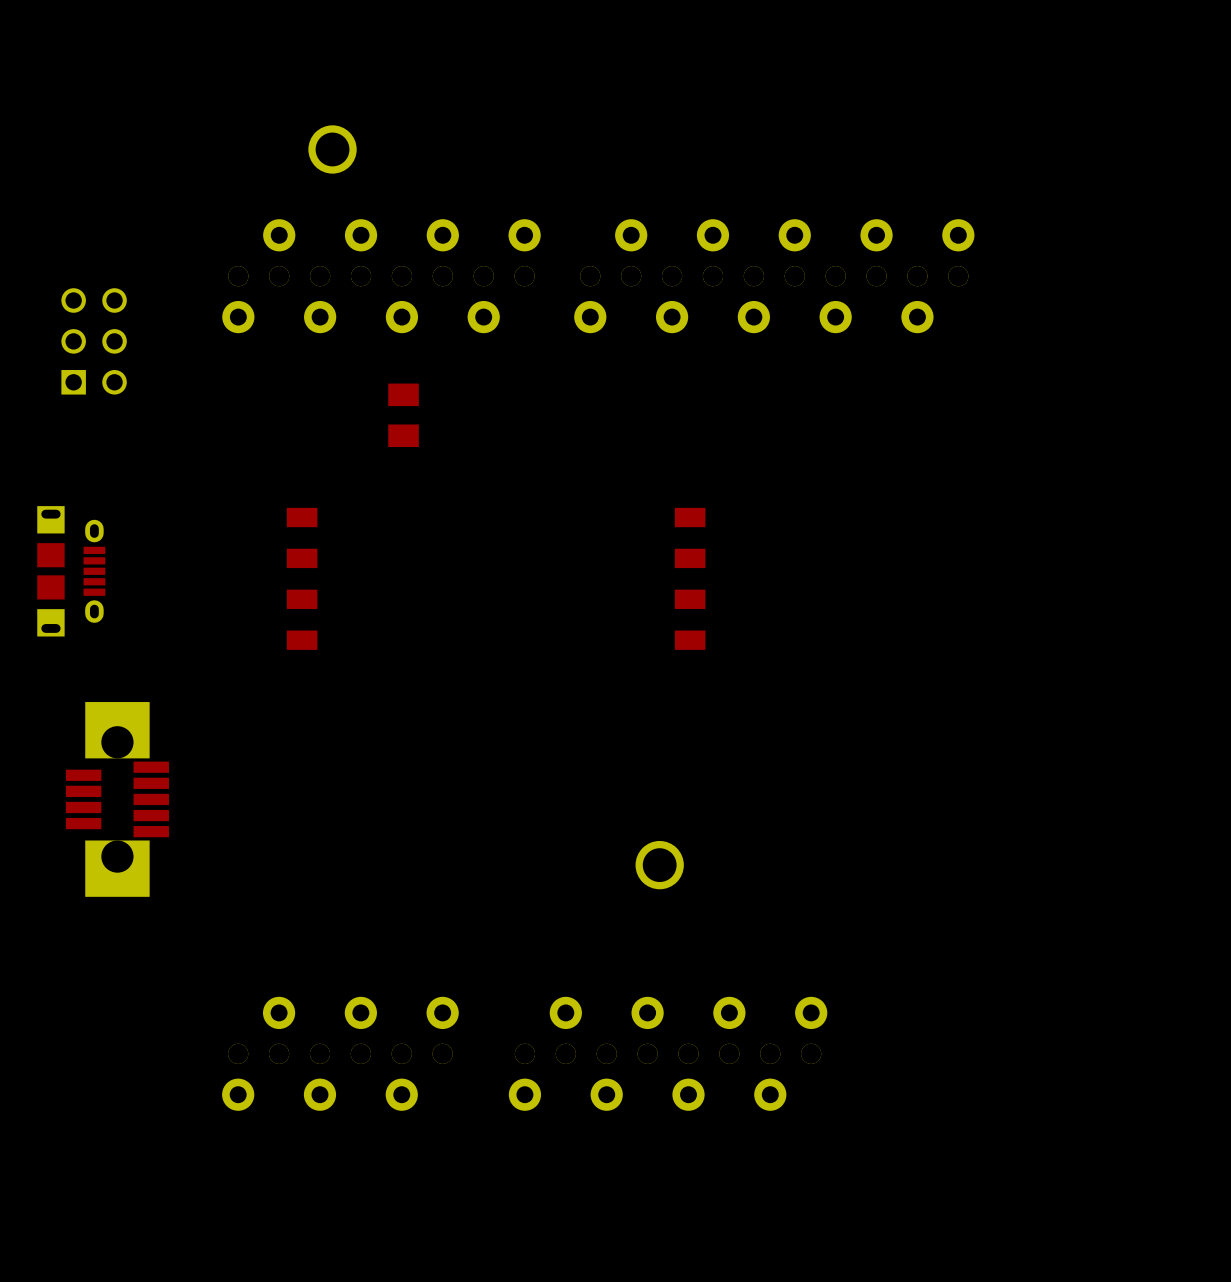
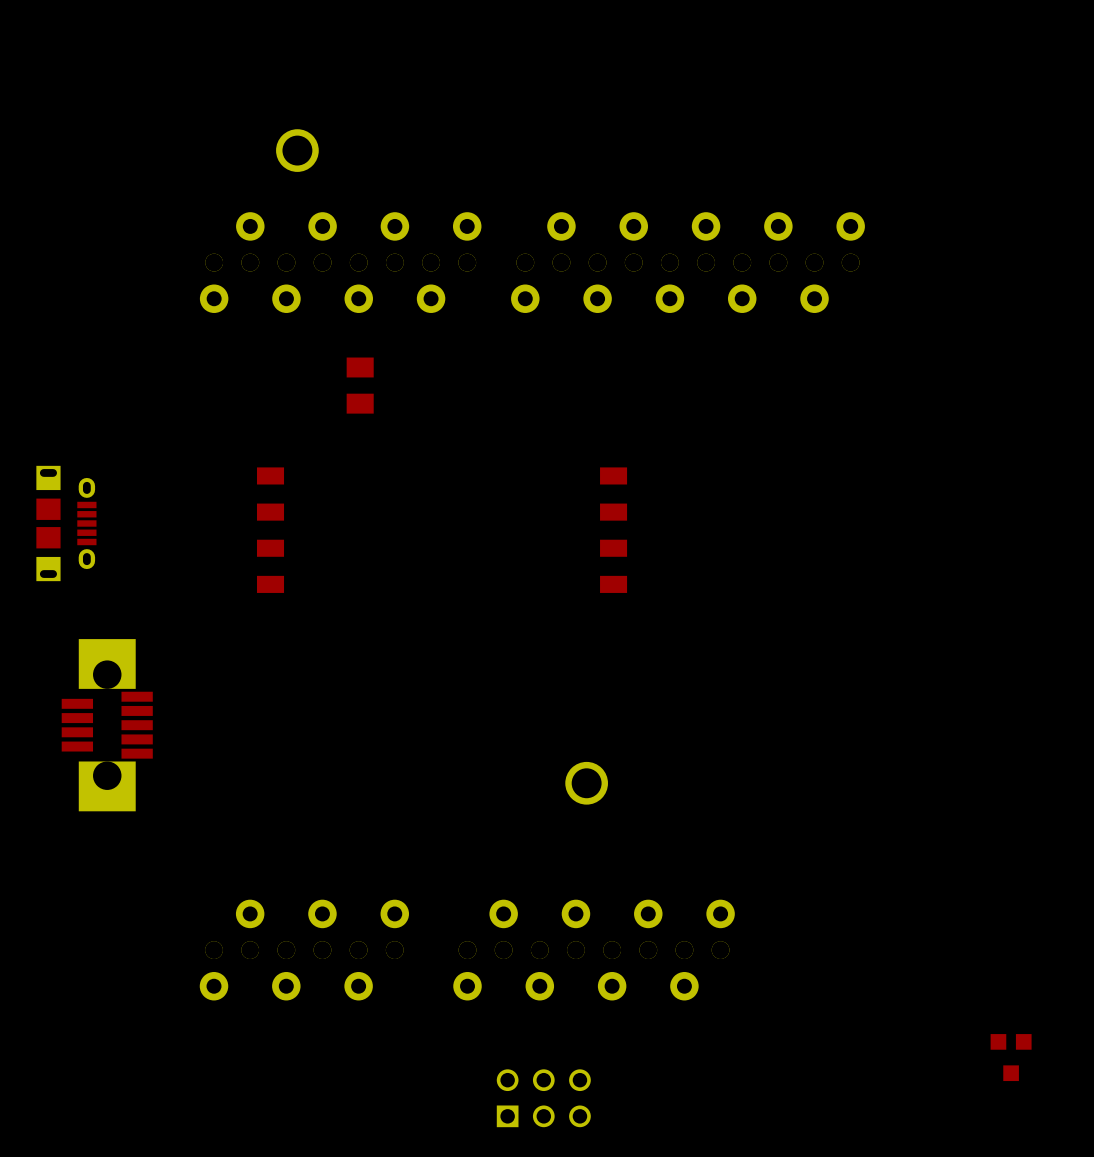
part: (94, 341) -> none
part: none -> (1011, 1057)
part: none -> (543, 1098)

